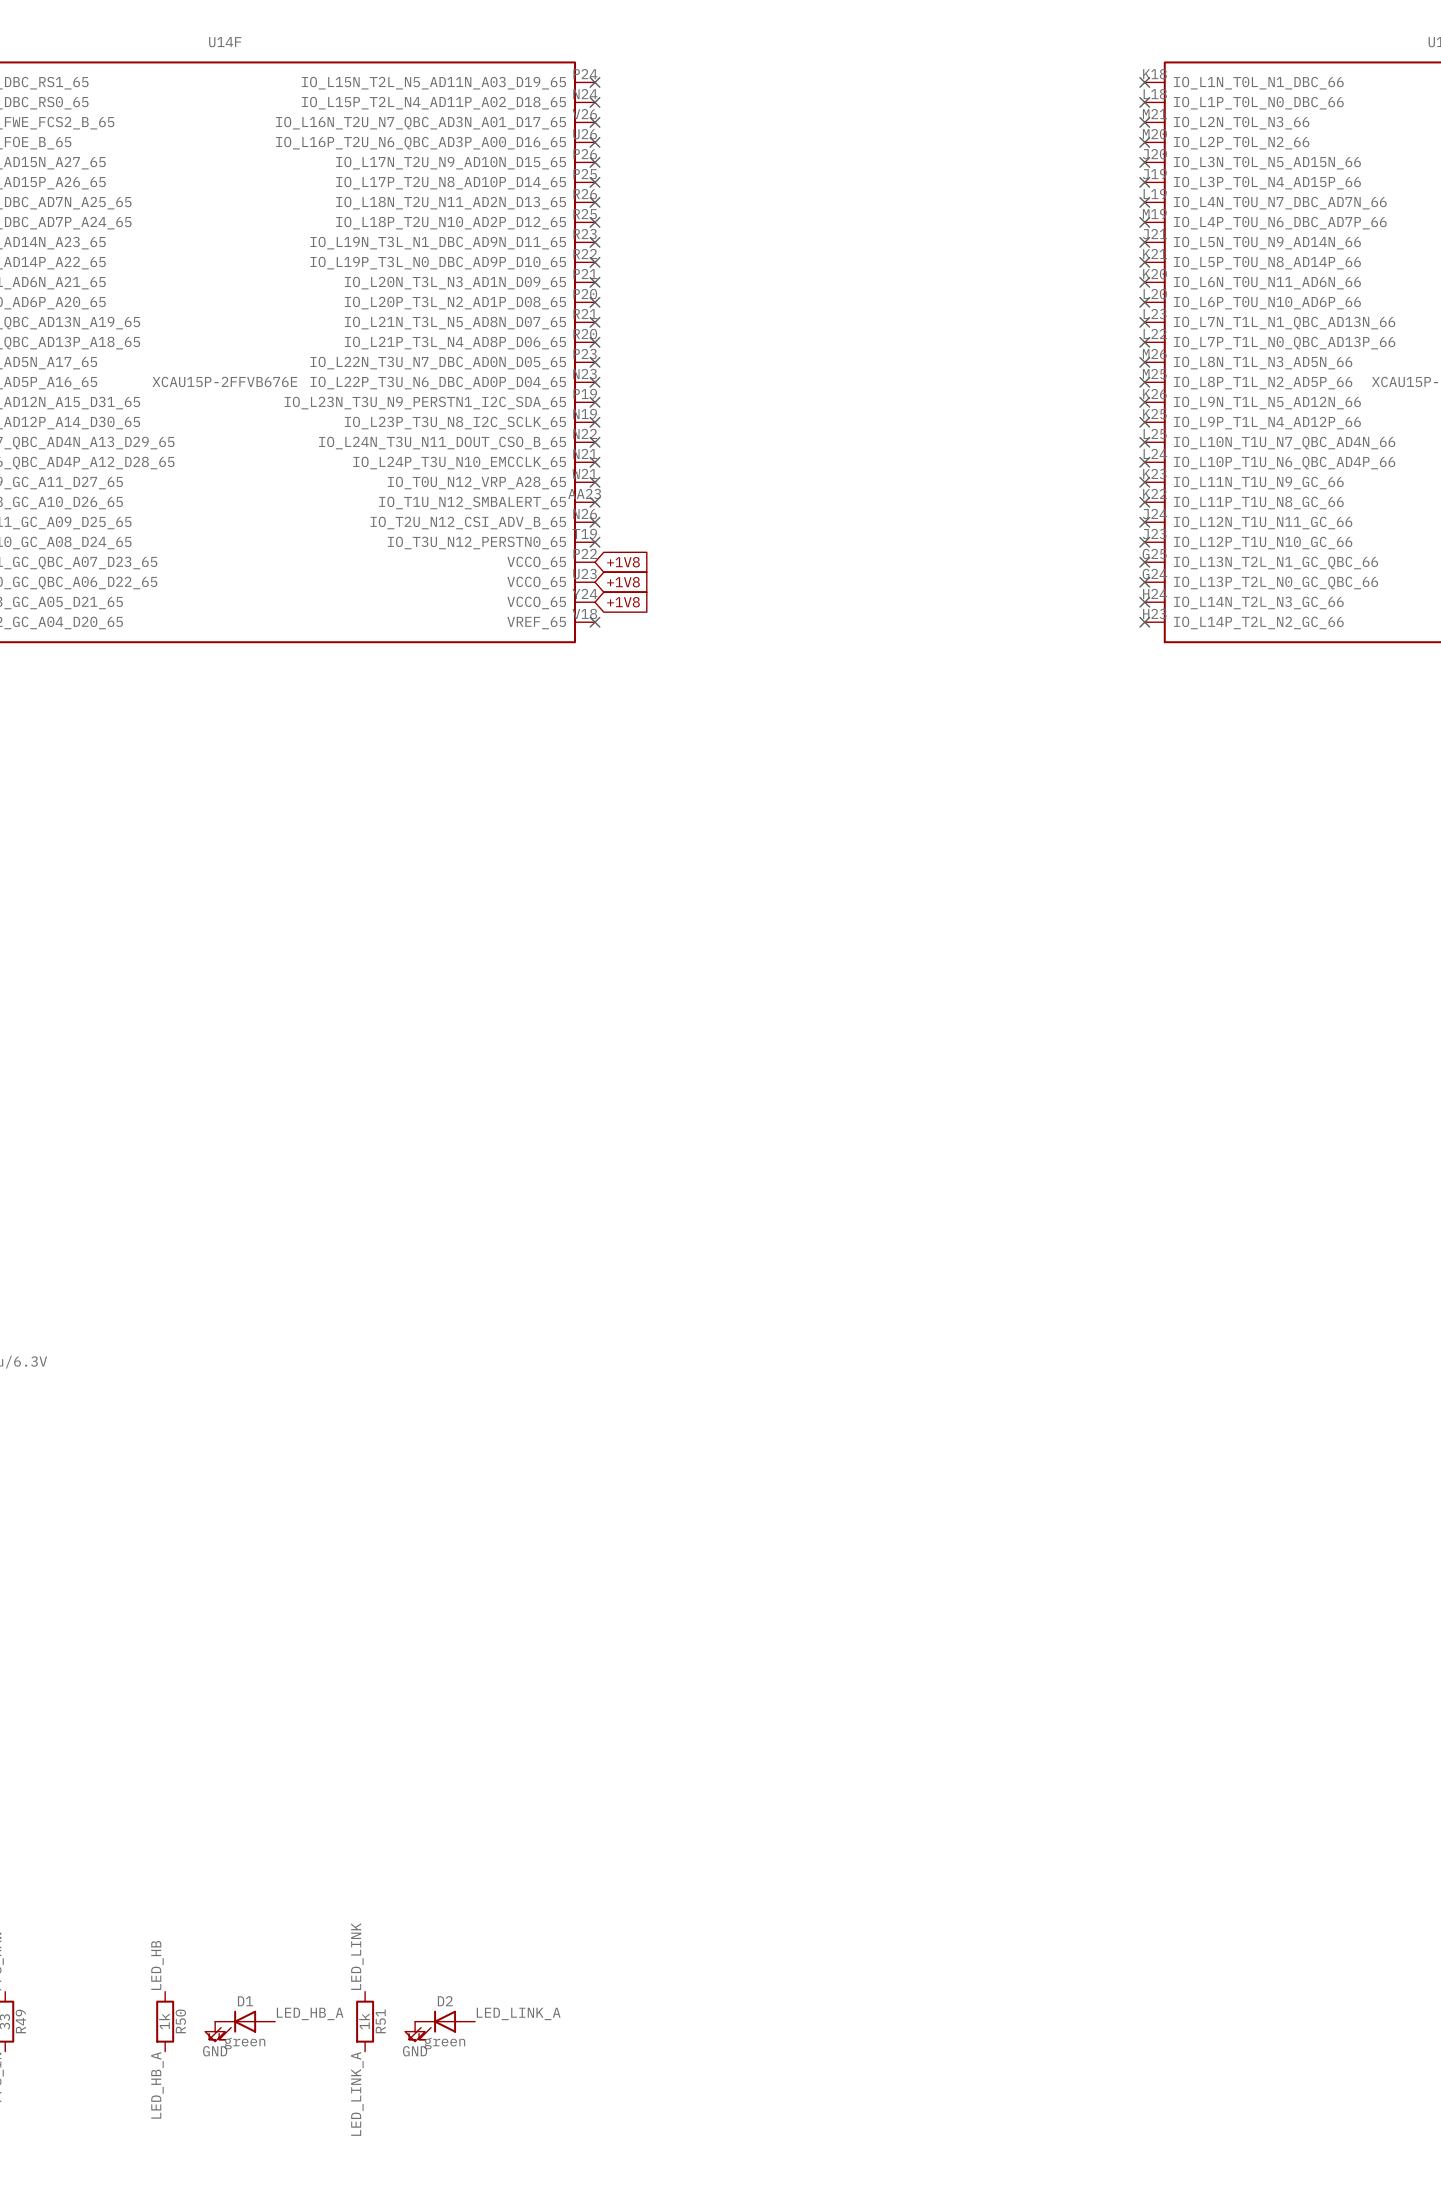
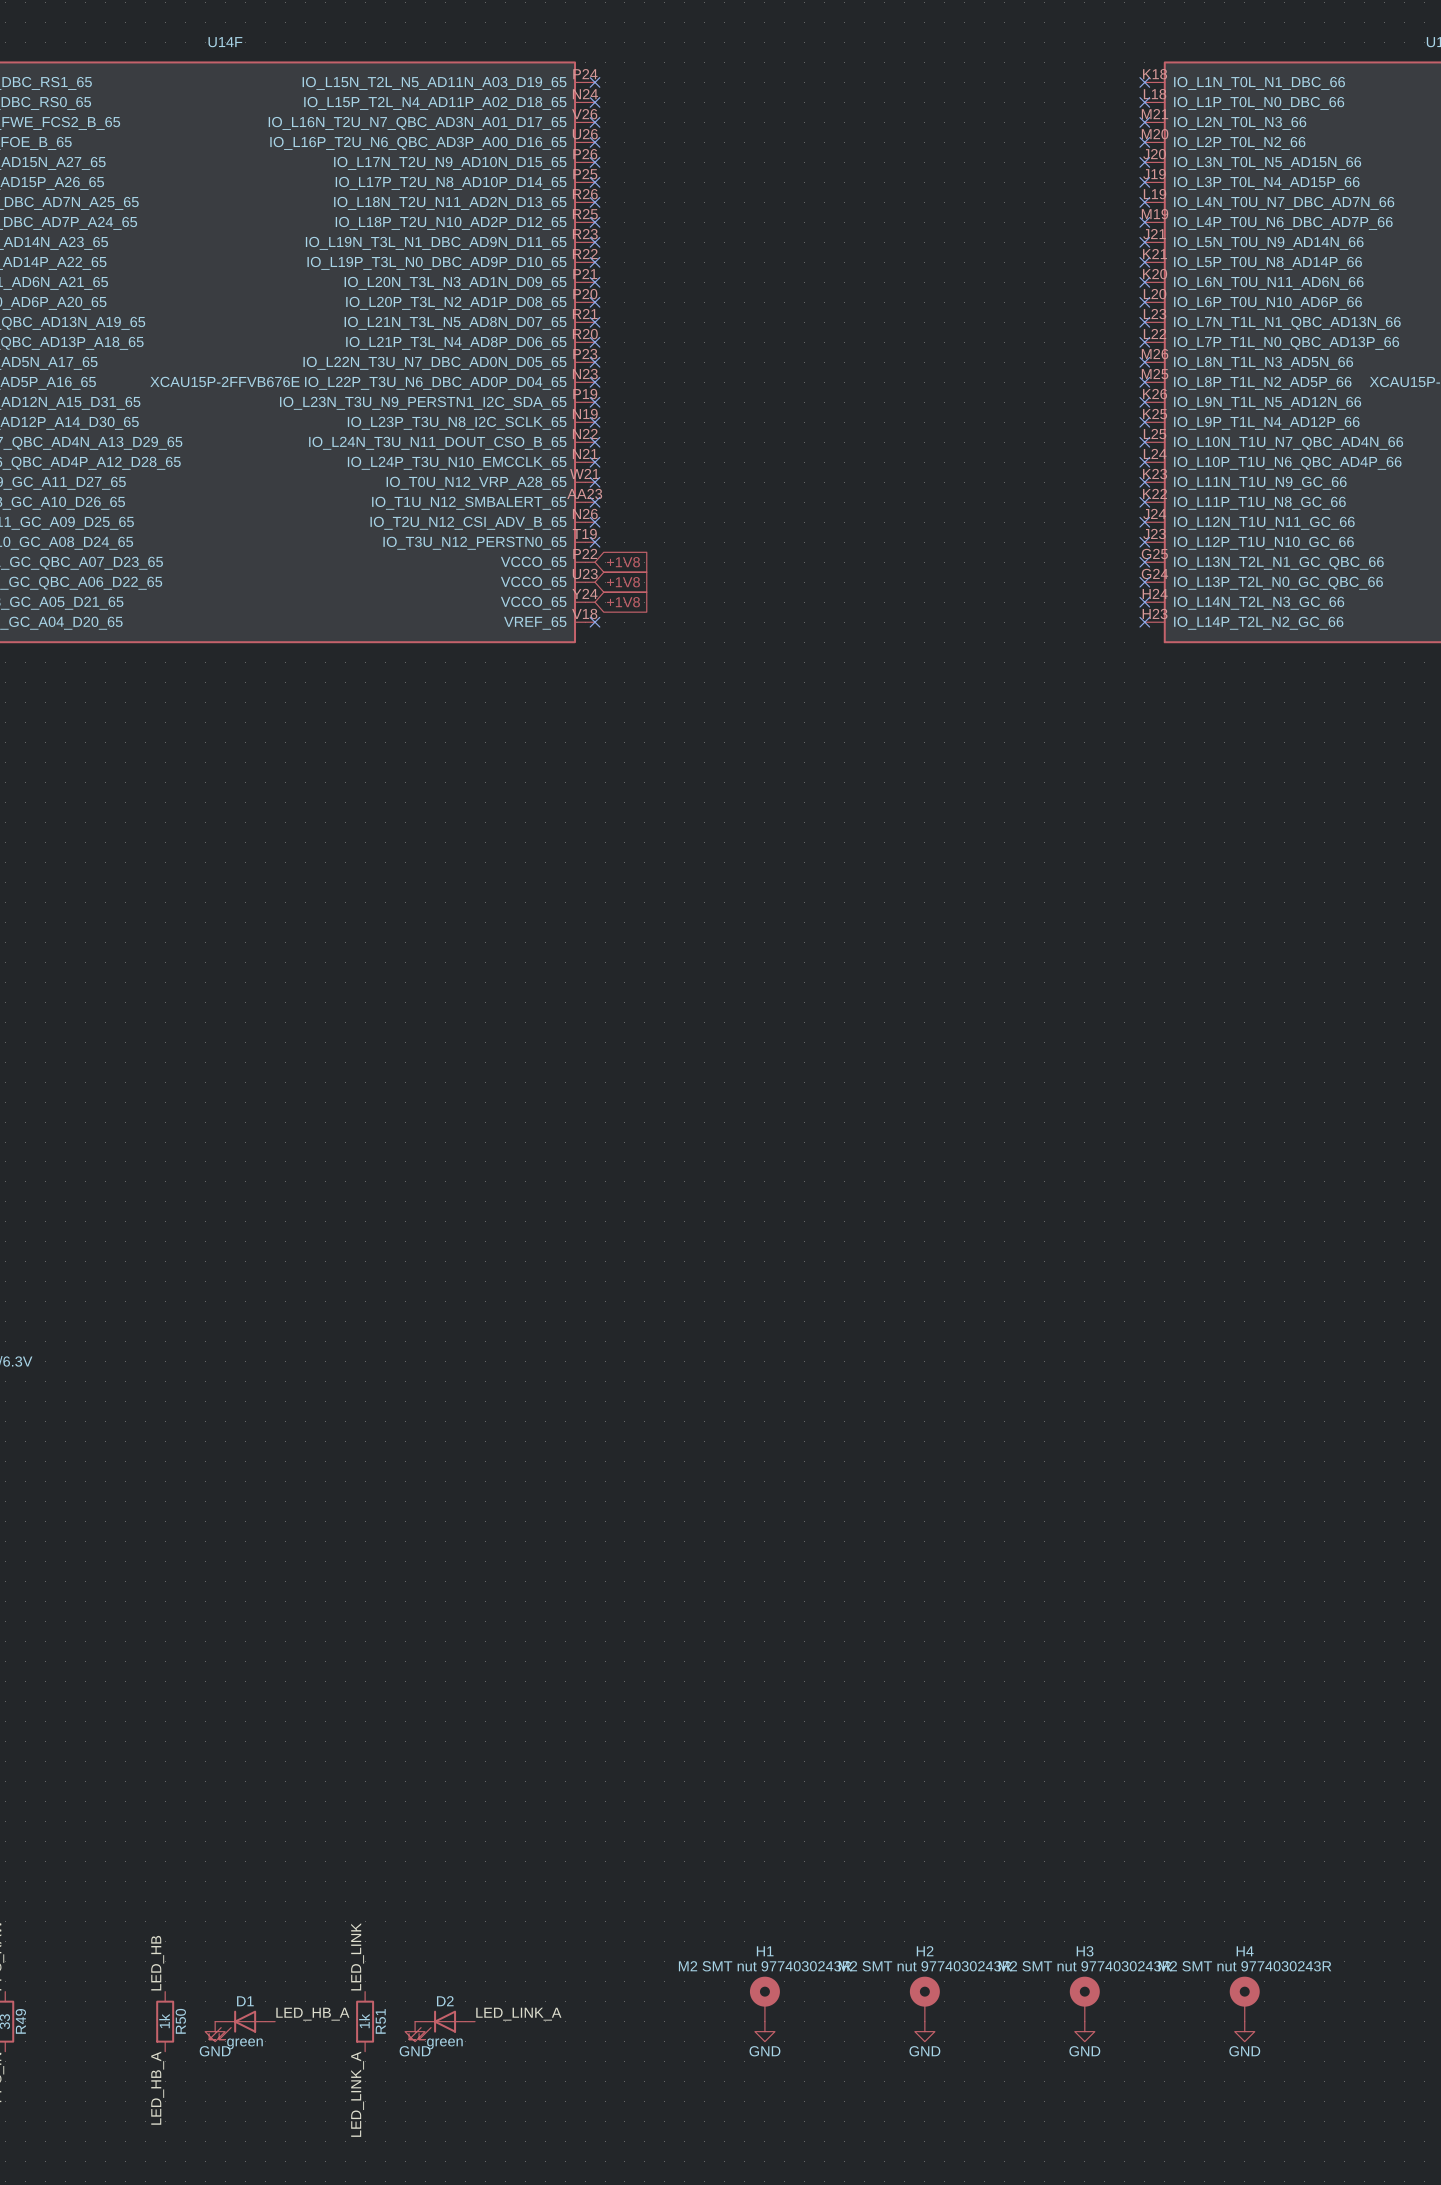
H1: none -> M2 SMT nut 9774030243R (764, 1999)
H2: none -> M2 SMT nut 9774030243R (924, 1999)
H3: none -> M2 SMT nut 9774030243R (1084, 1999)
H4: none -> M2 SMT nut 9774030243R (1244, 1999)
power symbol: none -> GND (764, 2031)
power symbol: none -> GND (924, 2031)
power symbol: none -> GND (1084, 2031)
power symbol: none -> GND (1244, 2031)

